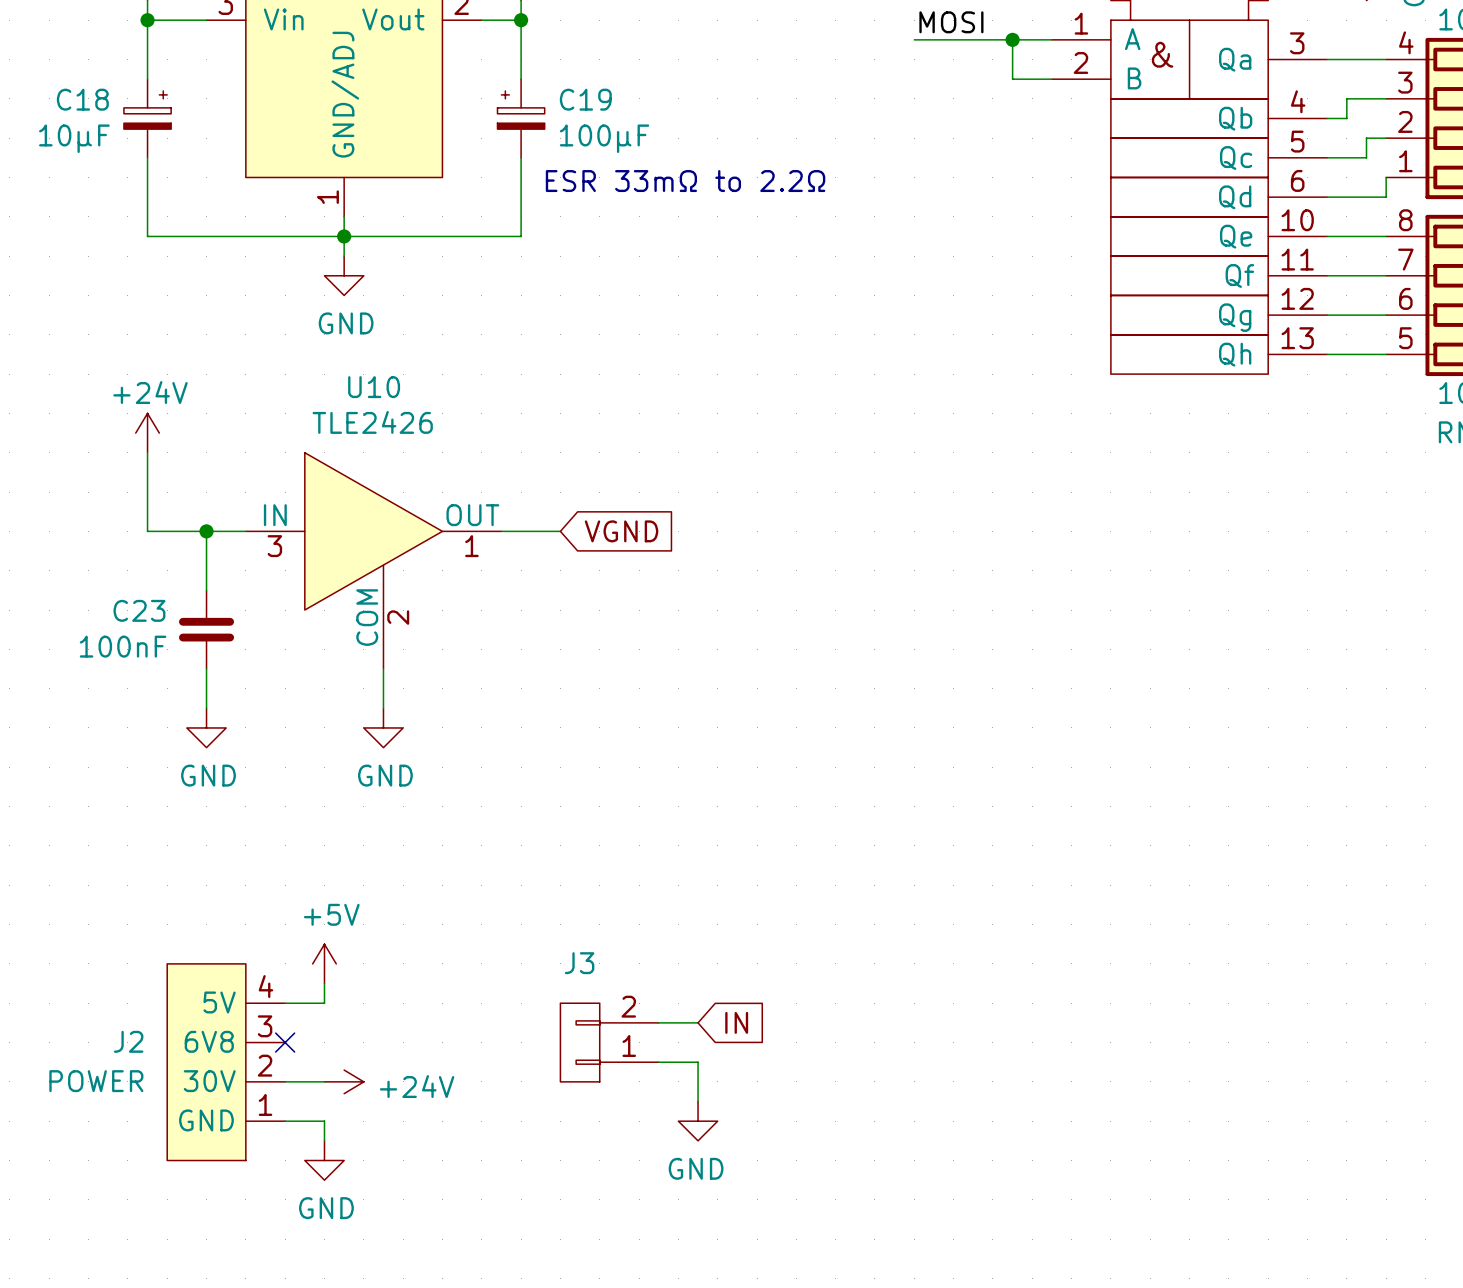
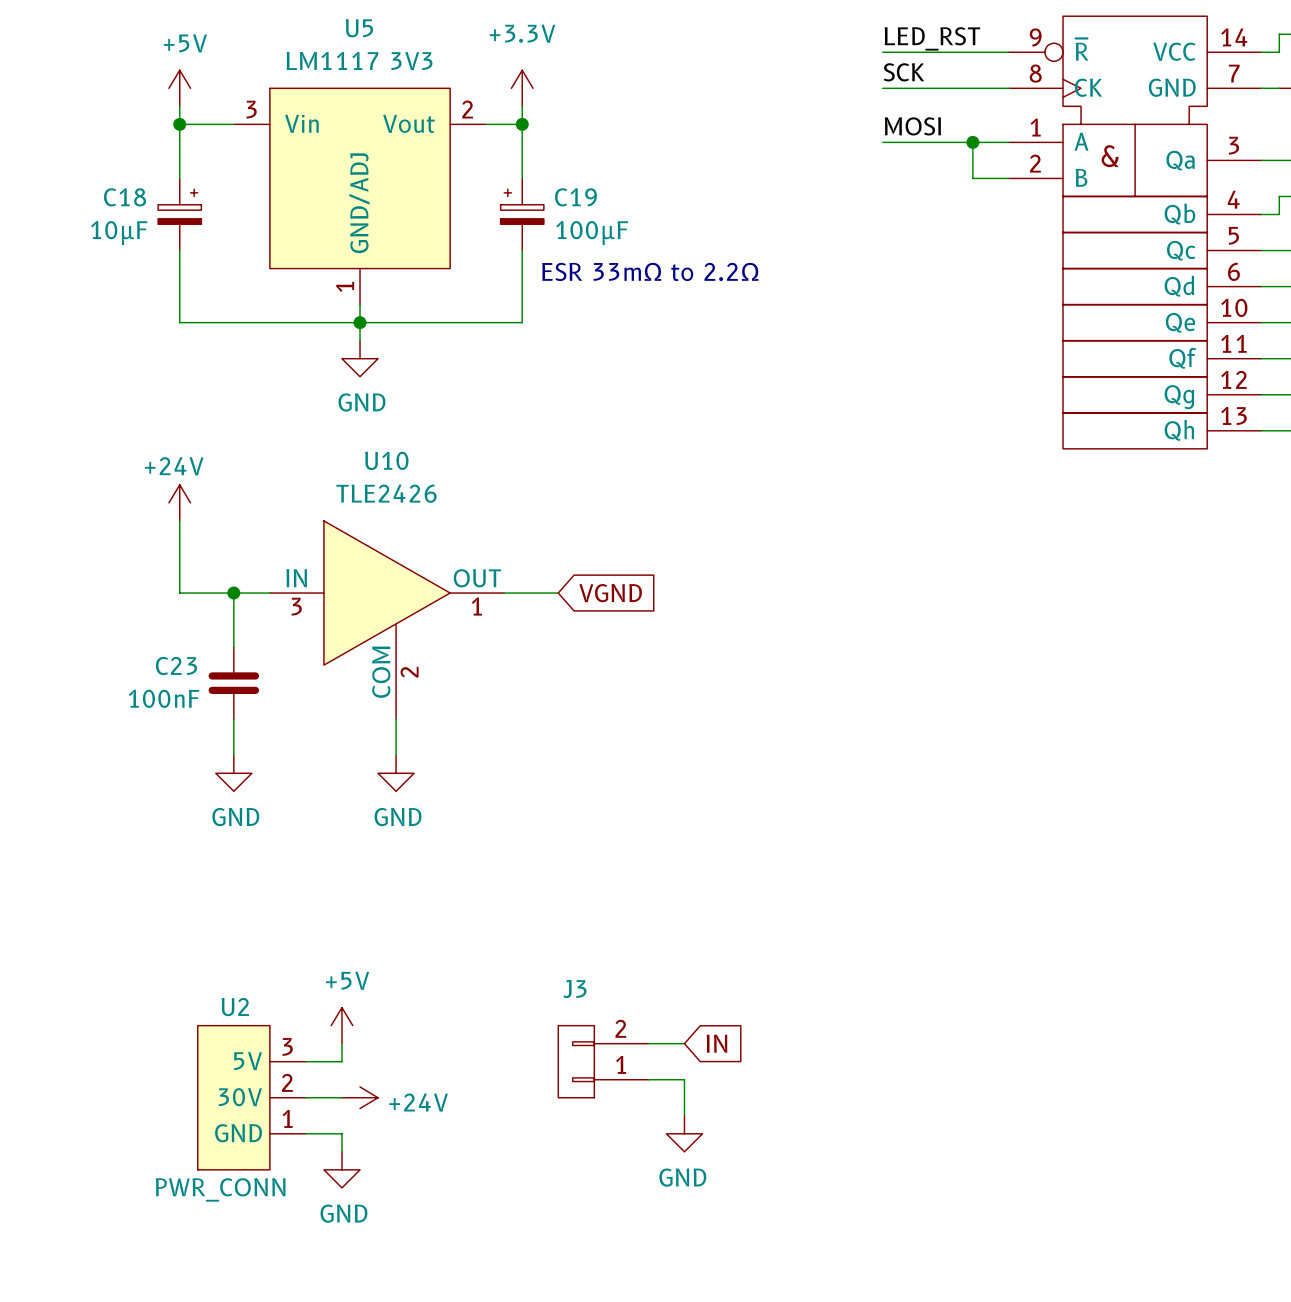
power symbol position: +5V (324, 963) -> +5V (341, 1025)
wire: (324, 983) (324, 1003) (285, 1003) -> (341, 1043) (341, 1061) (305, 1061)
no-connect mark: (285, 1042) -> none
J2: POWER (226, 1062) -> none
U2: none -> PWR_CONN (251, 1097)

